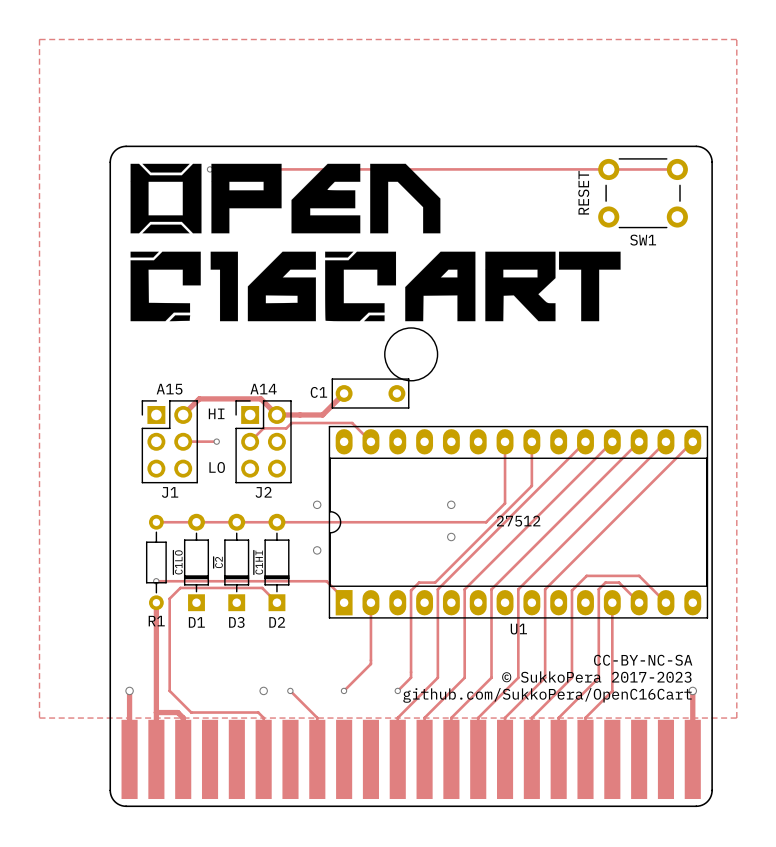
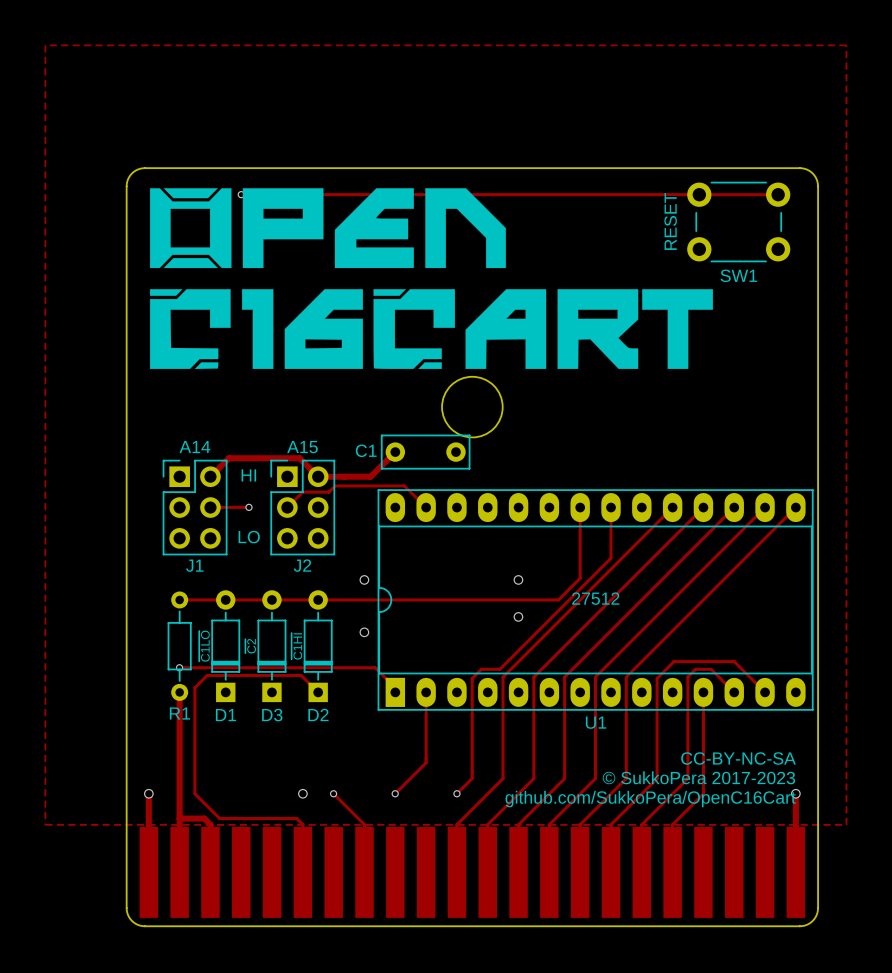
text: A15 (169, 389) -> A14 (194, 447)
text: A14 (263, 389) -> A15 (302, 447)

